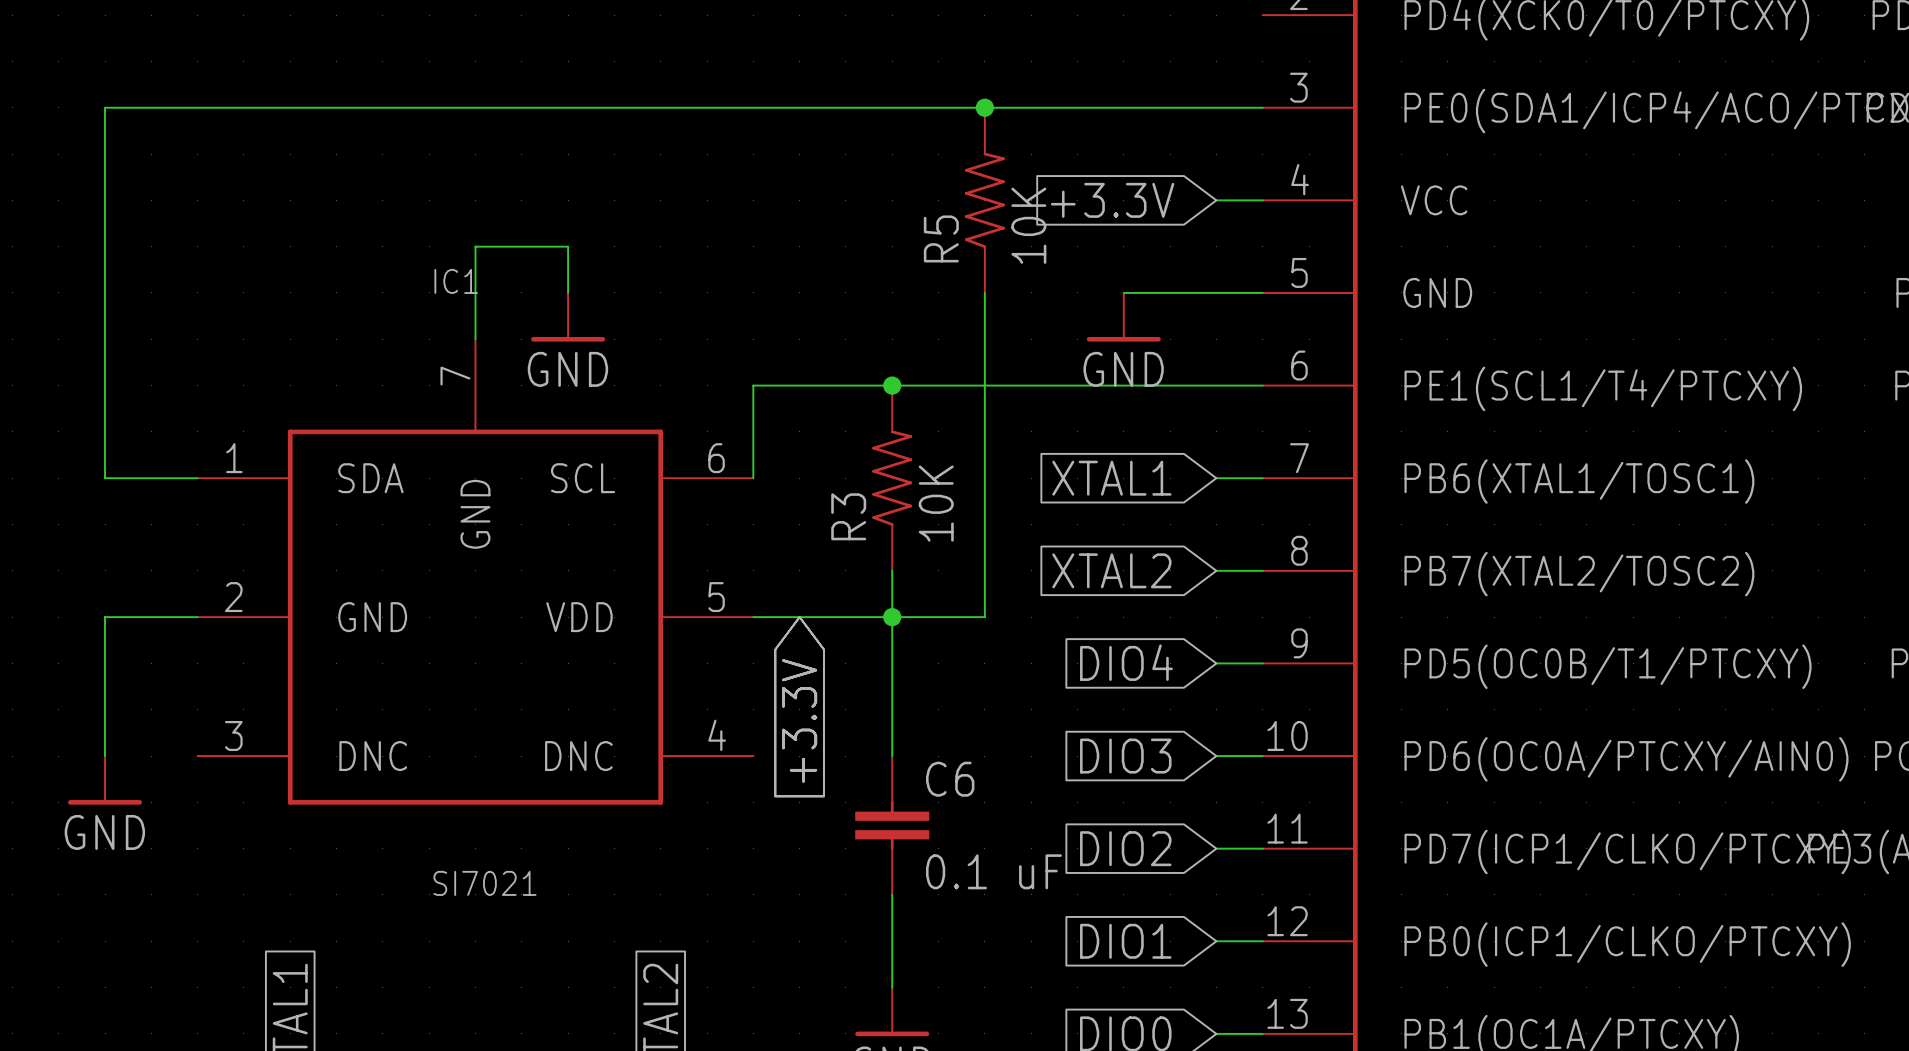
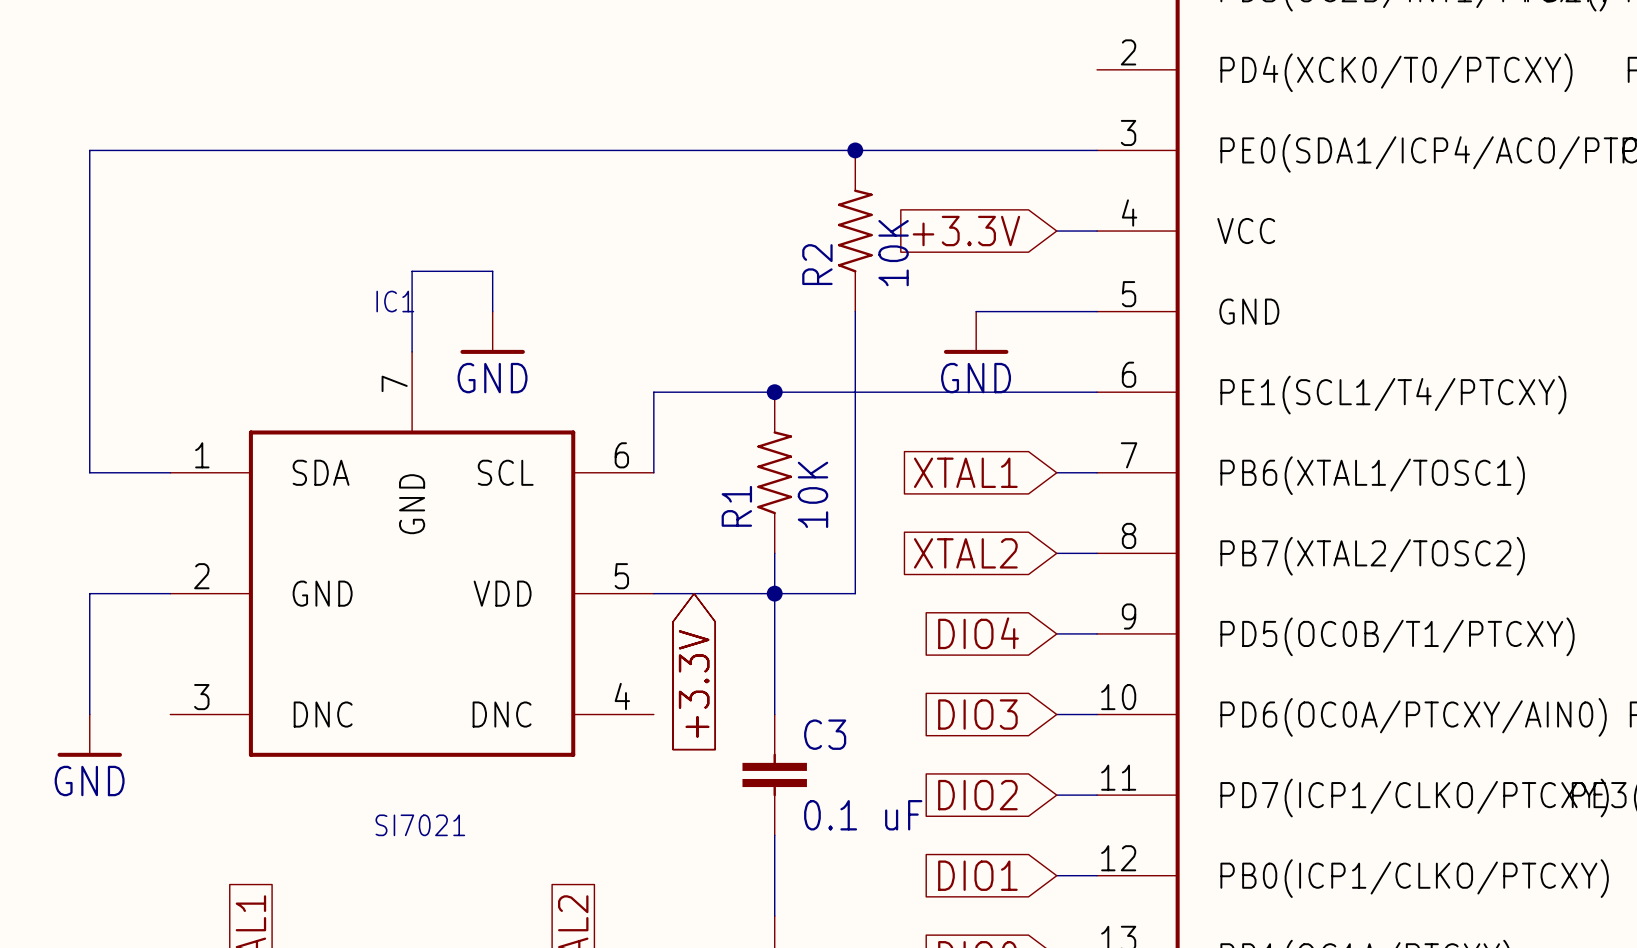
R5 name: R5 (941, 238) -> R2 (817, 264)
R3 name: R3 (848, 516) -> R1 (736, 506)
C6 name: C6 (950, 779) -> C3 (825, 734)

